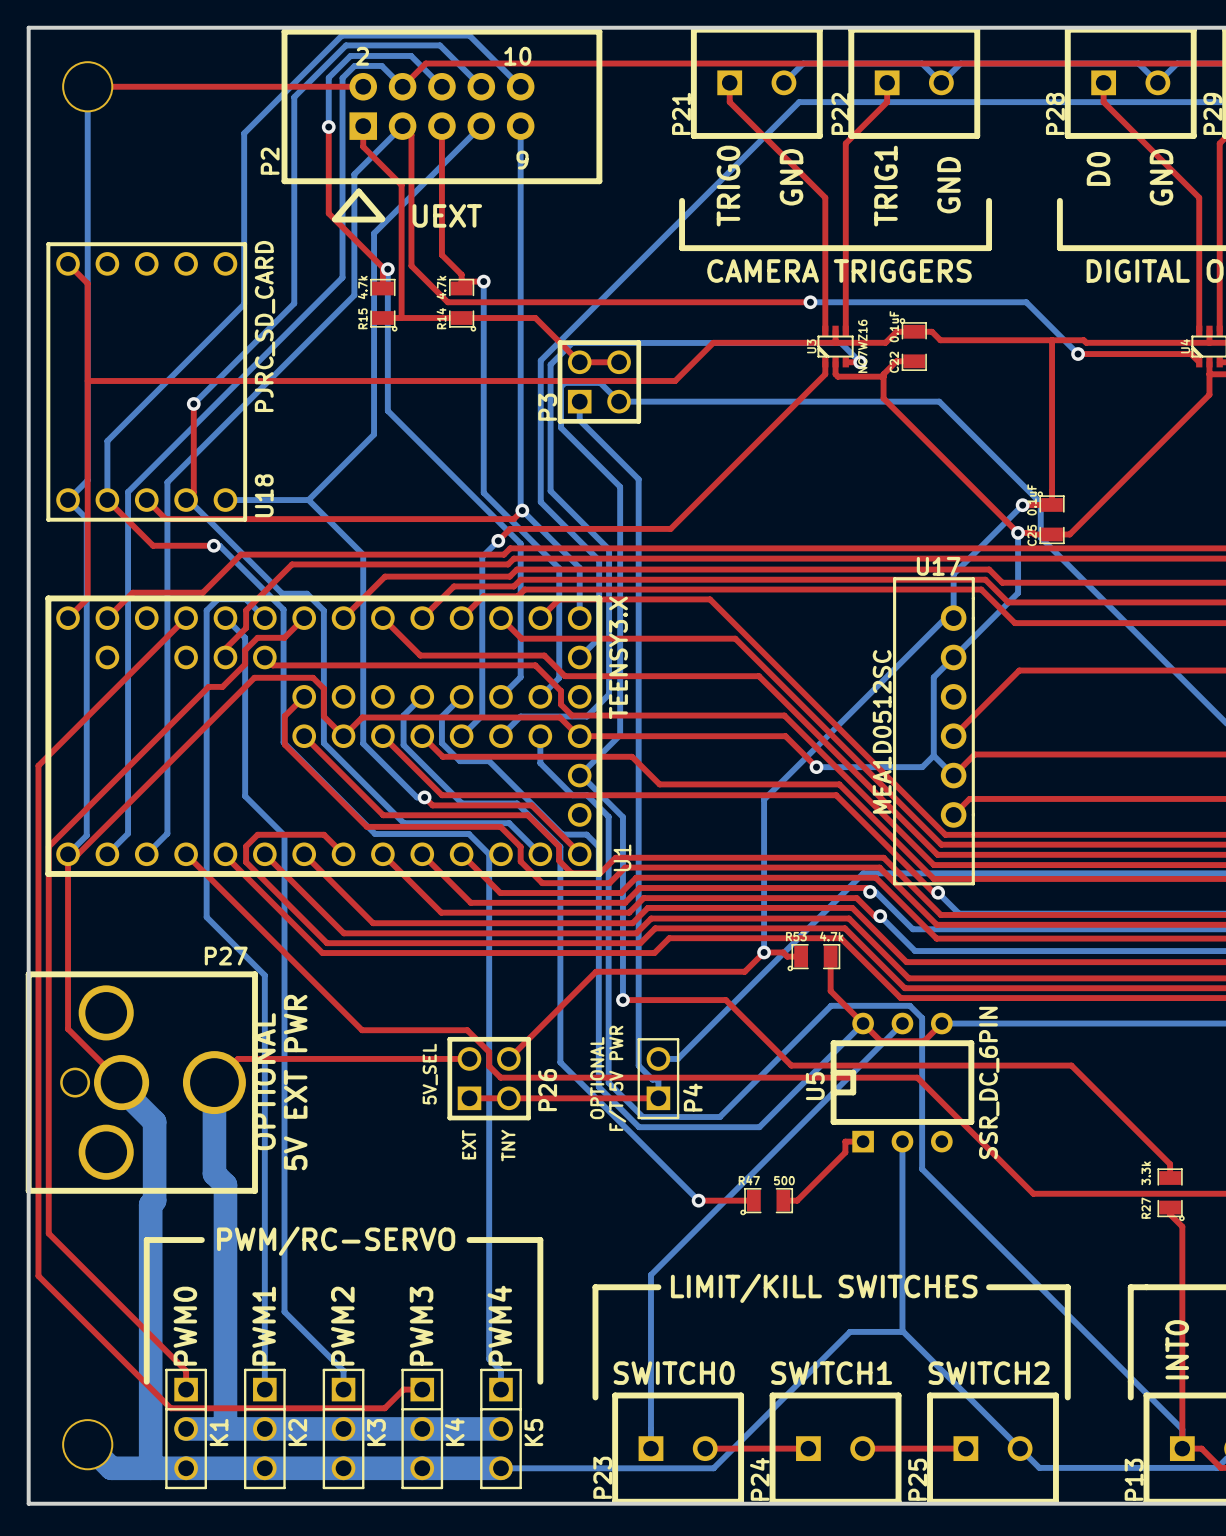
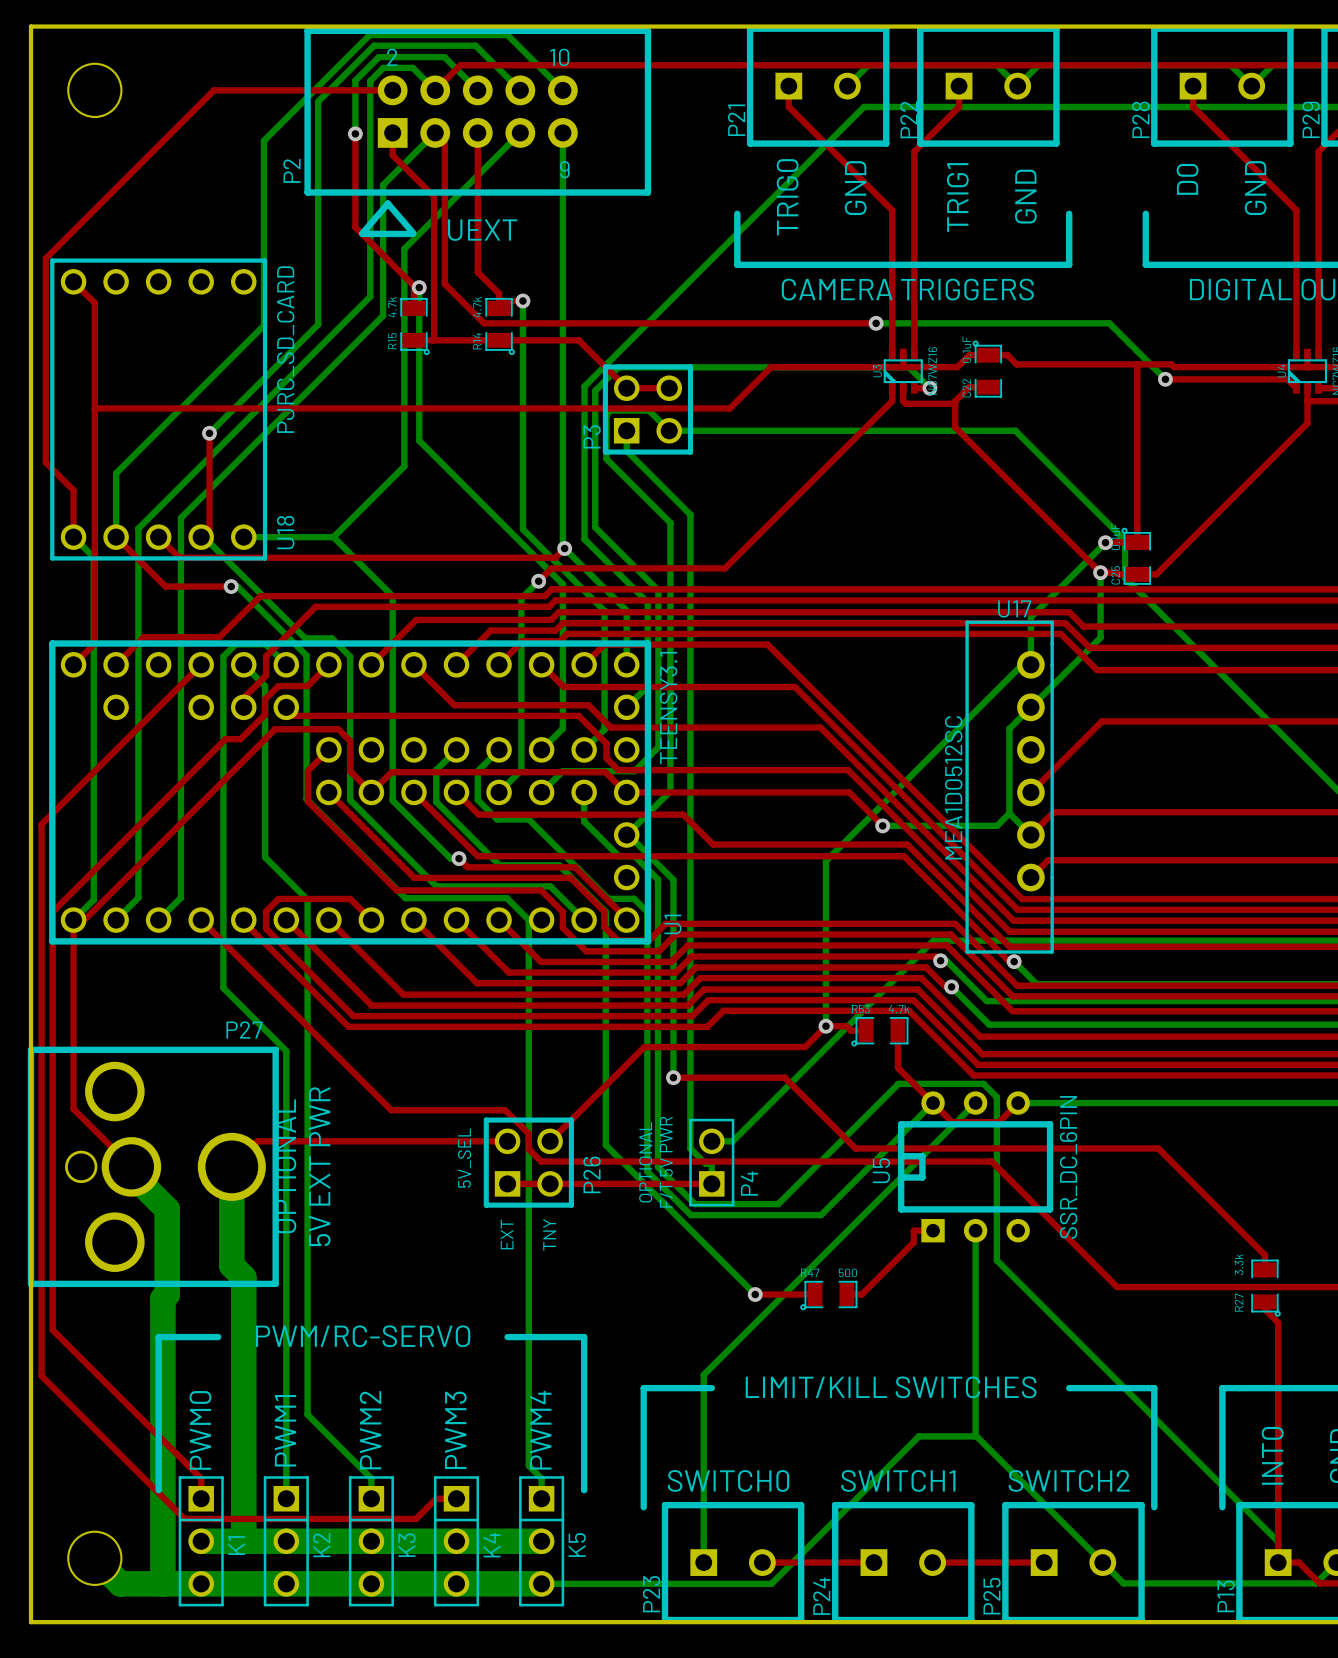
top track: (87, 86) (197, 86) -> (73, 537) (73, 490) (45, 462) (45, 258) (213, 90)
bottom track: (87, 86) (87, 480) (68, 500) -> none
U1 value: TEENSY3.X (618, 657) -> TEENSY3.1 (668, 707)

